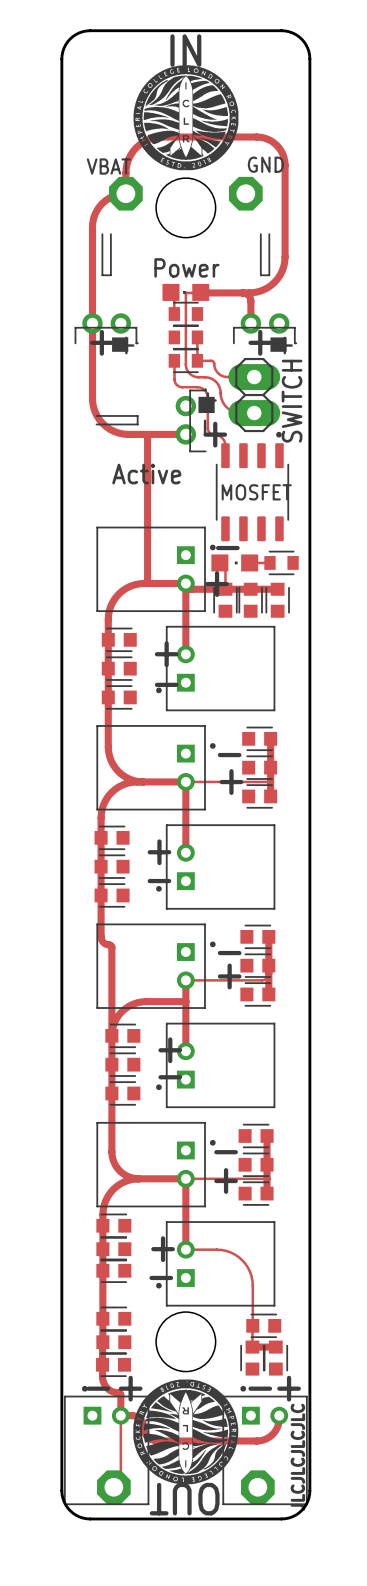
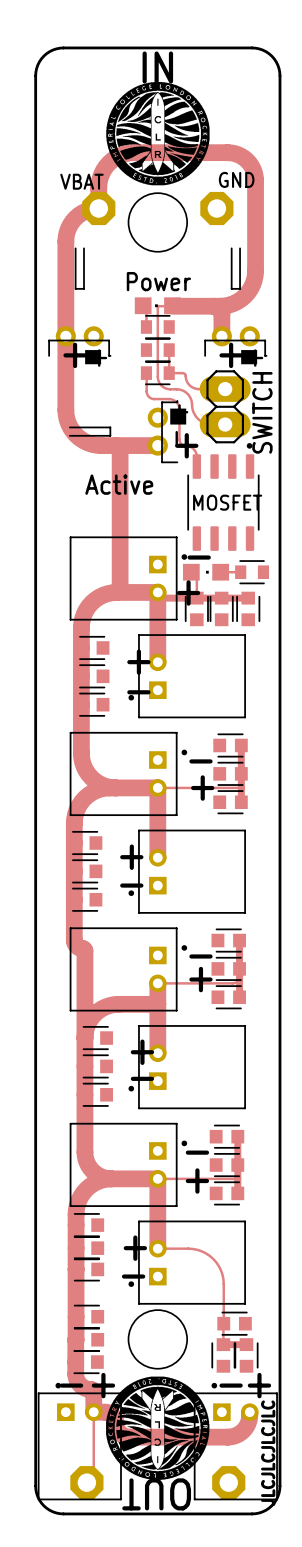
track width: thin (201, 292) (258, 291) (274, 282) (282, 270) (285, 256) (284, 161) (279, 148) (267, 139) (256, 137) (161, 137) (148, 139) (136, 147) (128, 159) (126, 168) (125, 193) (113, 196) (105, 200) (99, 206) (93, 218) (92, 398) (95, 412) (106, 426) (119, 433) (185, 434) -> thick (172, 306) (229, 305) (245, 295) (252, 284) (255, 270) (255, 176) (249, 163) (238, 154) (227, 152) (134, 152) (120, 155) (109, 163) (101, 174) (99, 183) (98, 208) (86, 211) (78, 215) (72, 221) (66, 232) (65, 410) (68, 423) (79, 438) (92, 444) (157, 445)
track width: thin (242, 292) (247, 294) (250, 299) (250, 323) -> thick (213, 306) (218, 307) (221, 312) (221, 336)
track width: thin (147, 438) (147, 580) -> thick (120, 449) (120, 589)
track width: thin (185, 654) (185, 583) (134, 584) (126, 588) (115, 597) (109, 610) (108, 619) (108, 751) (112, 764) (118, 771) (129, 779) (143, 781) -> thick (157, 662) (157, 592) (107, 593) (99, 597) (88, 606) (82, 618) (81, 627) (81, 757) (86, 770) (91, 777) (102, 785) (115, 787)
track width: thin (185, 852) (185, 781) (132, 782) (119, 786) (108, 796) (102, 808) (101, 817) (101, 936) (103, 942) (111, 947) (112, 1155) (119, 1170) (128, 1176) (138, 1178) -> thick (157, 857) (157, 787) (105, 788) (92, 792) (81, 801) (75, 814) (74, 823) (74, 940) (76, 946) (84, 951) (85, 1155) (92, 1171) (101, 1176) (111, 1178)
track width: thin (185, 980) (185, 1051) -> thick (157, 983) (157, 1053)
track width: thin (185, 1001) (146, 1001) (133, 1004) (121, 1011) (116, 1018) (111, 1035) -> thick (157, 1004) (118, 1004) (105, 1006) (94, 1014) (89, 1021) (84, 1038)
track width: thin (138, 1178) (185, 1178) (185, 1249) -> thick (111, 1178) (157, 1178) (157, 1248)
track width: thin (138, 1178) (125, 1181) (113, 1189) (107, 1196) (103, 1210) (102, 1378) (108, 1389) (120, 1393) (120, 1415) (133, 1415) (138, 1417) (146, 1435) (157, 1441) (262, 1440) (274, 1432) (278, 1424) (279, 1415) -> thick (111, 1178) (97, 1181) (86, 1189) (80, 1196) (76, 1209) (75, 1375) (81, 1386) (93, 1390) (93, 1412) (111, 1414) (118, 1431) (129, 1437) (233, 1436) (245, 1428) (249, 1420) (249, 1412)

